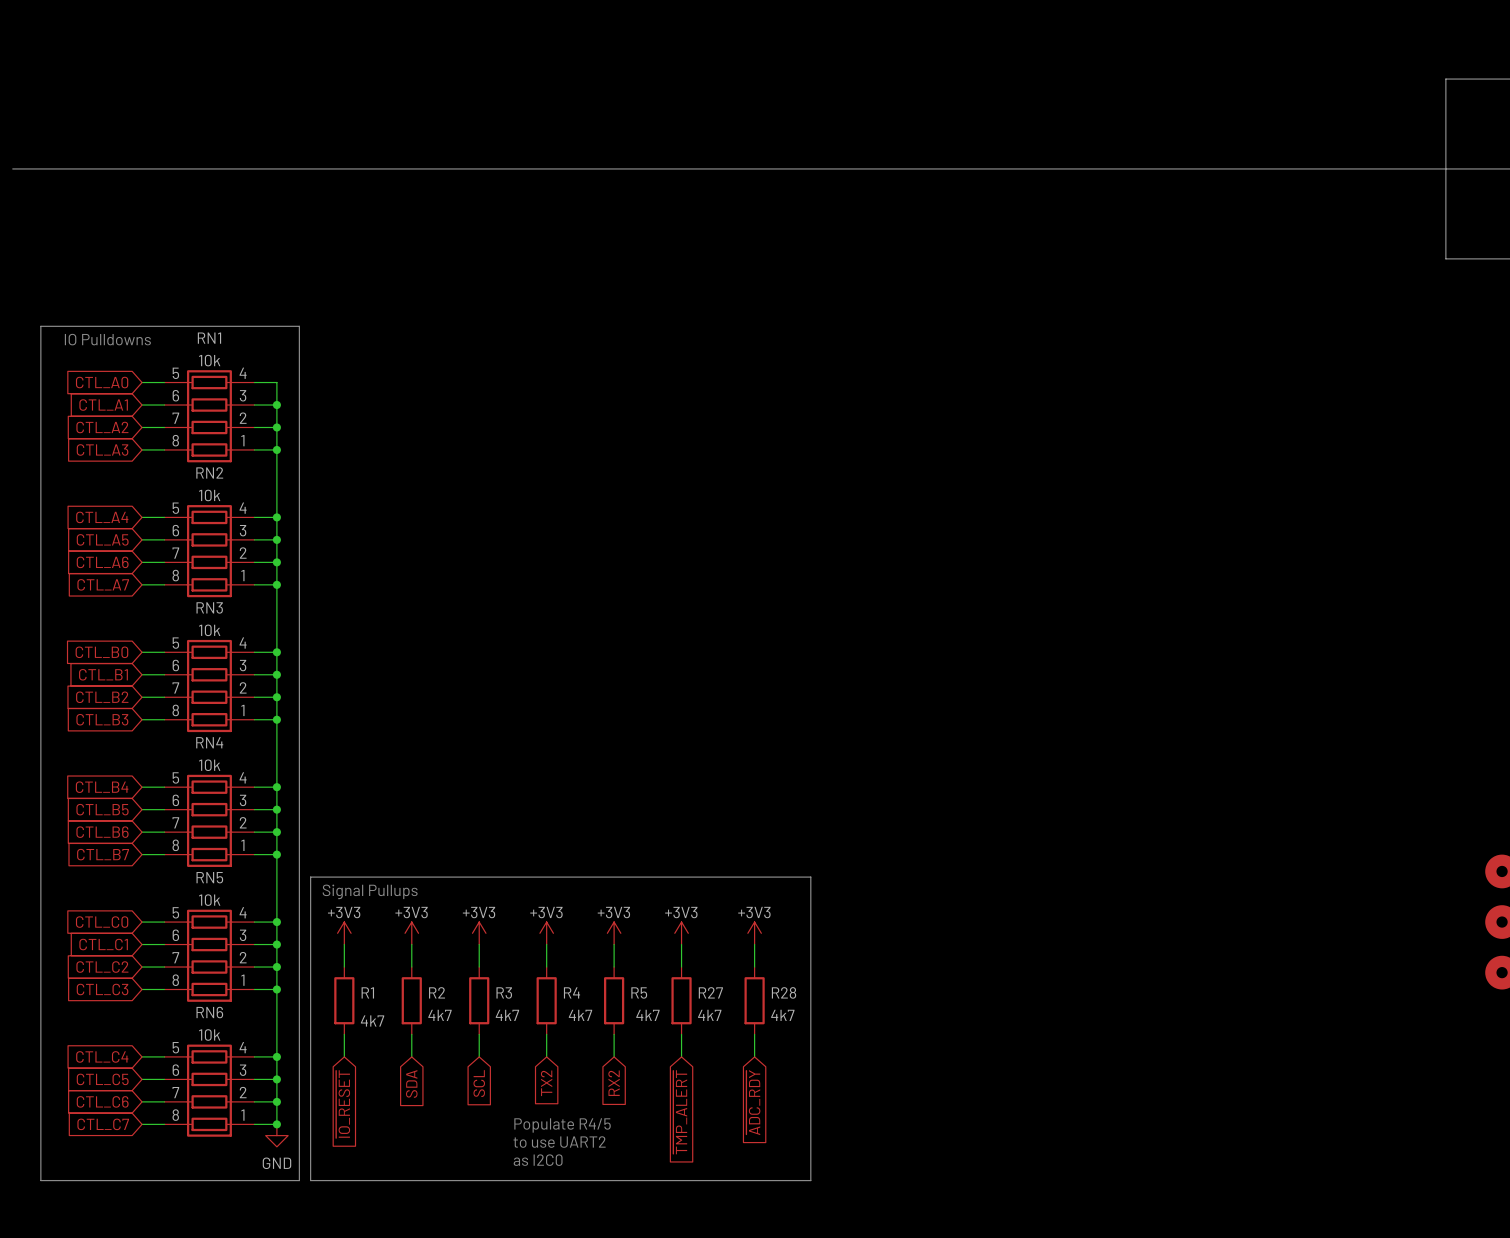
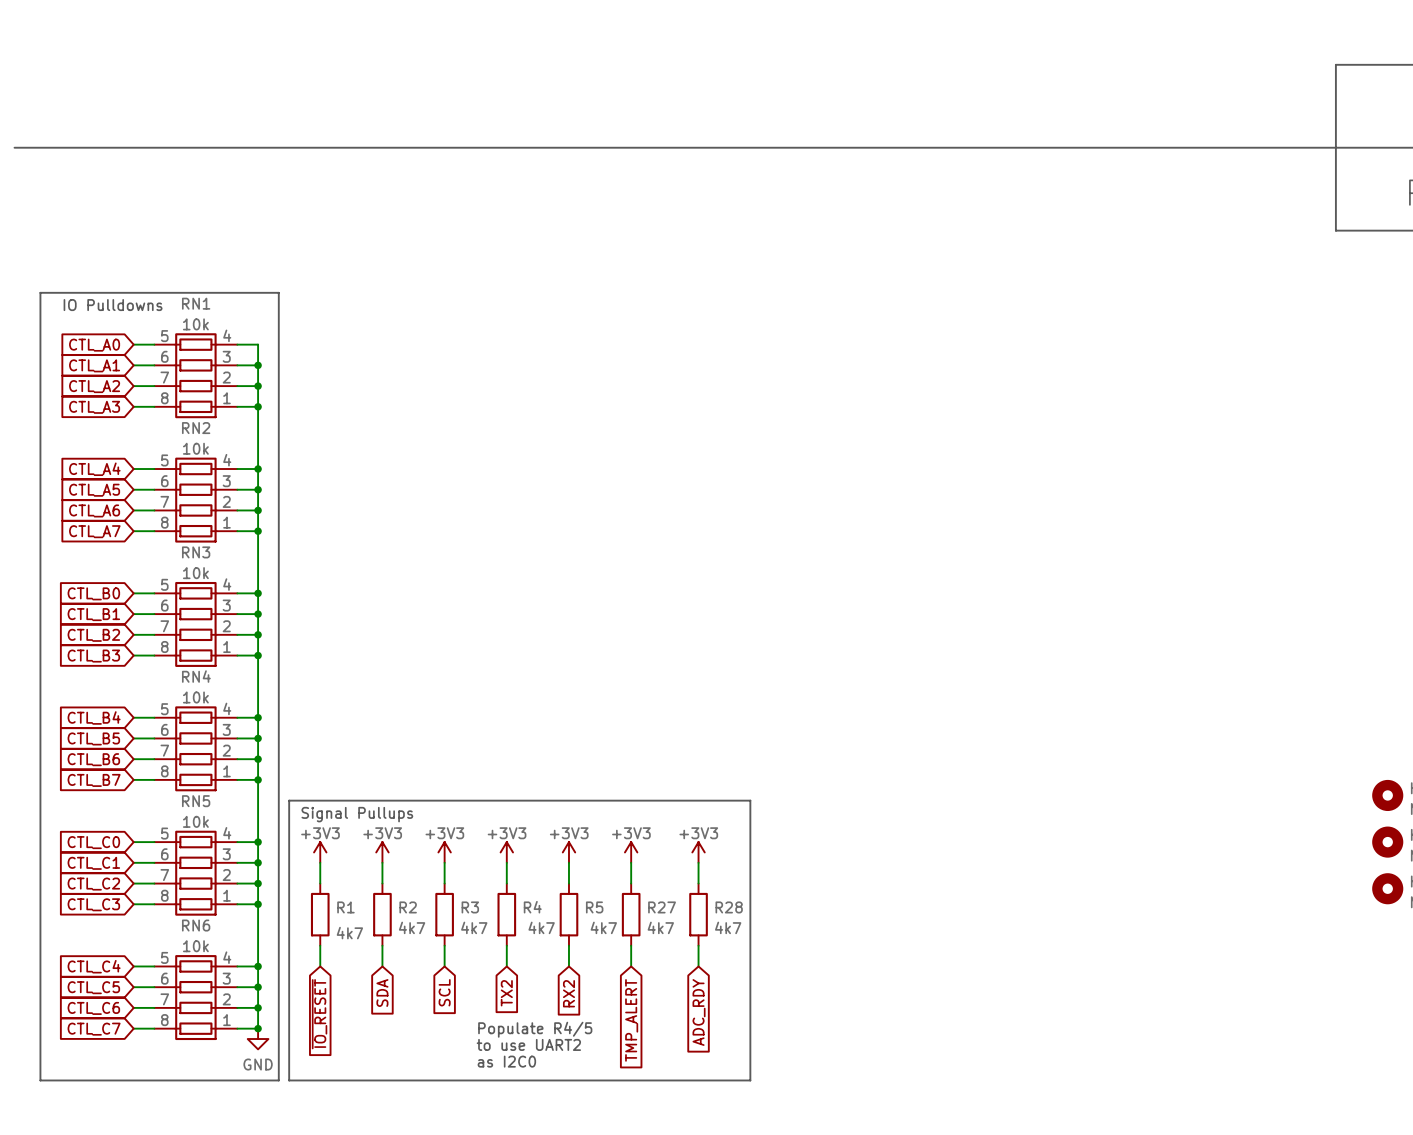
global label: ~{ADC_RDY} (753, 1102) -> ADC_RDY (699, 1012)
global label: ~{TMP_ALERT} (680, 1112) -> TMP_ALERT (631, 1020)

